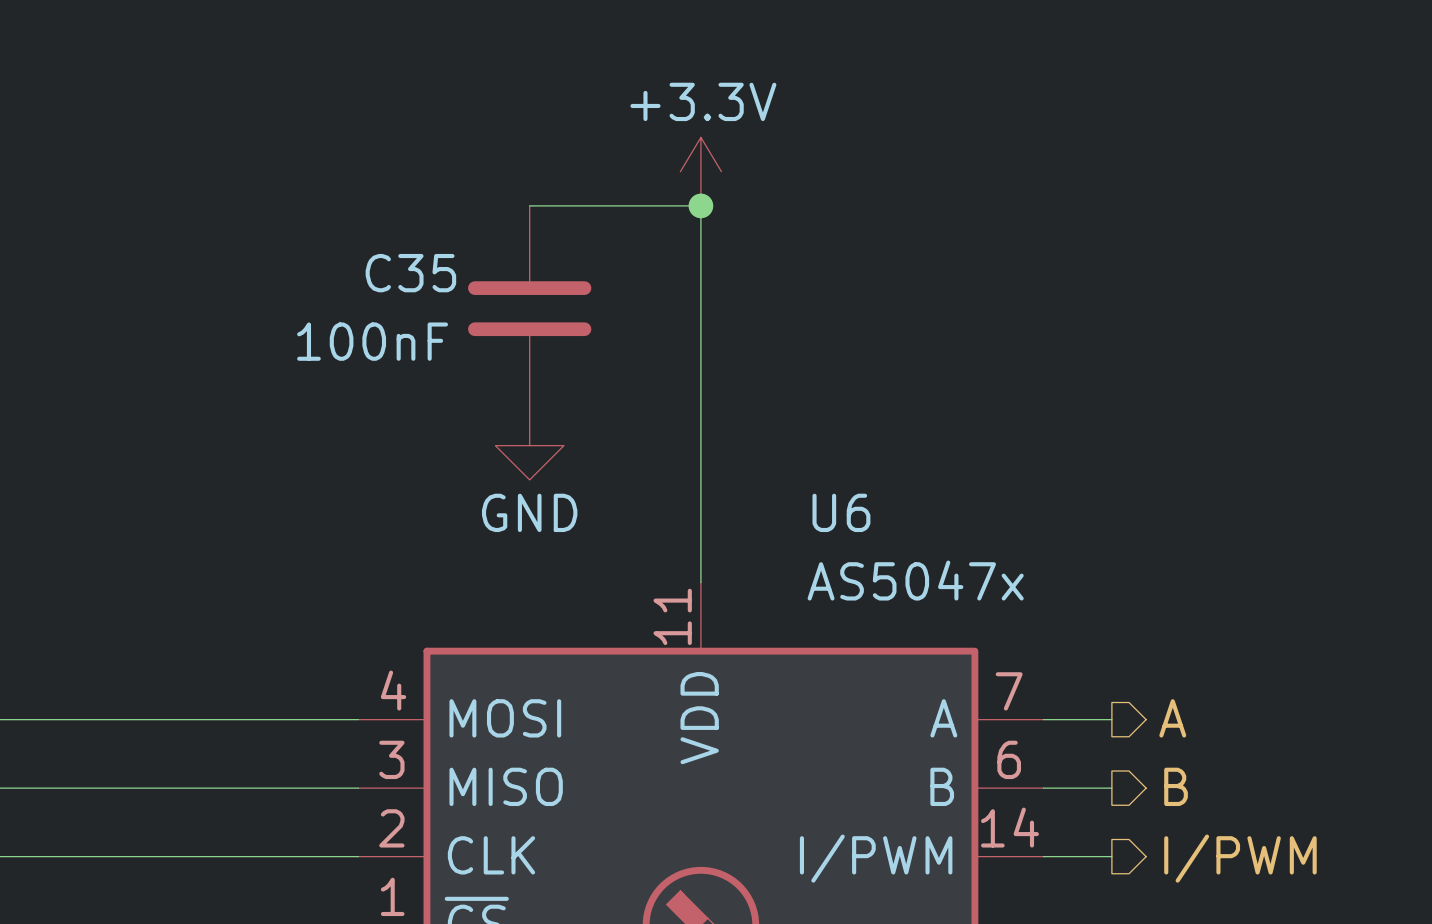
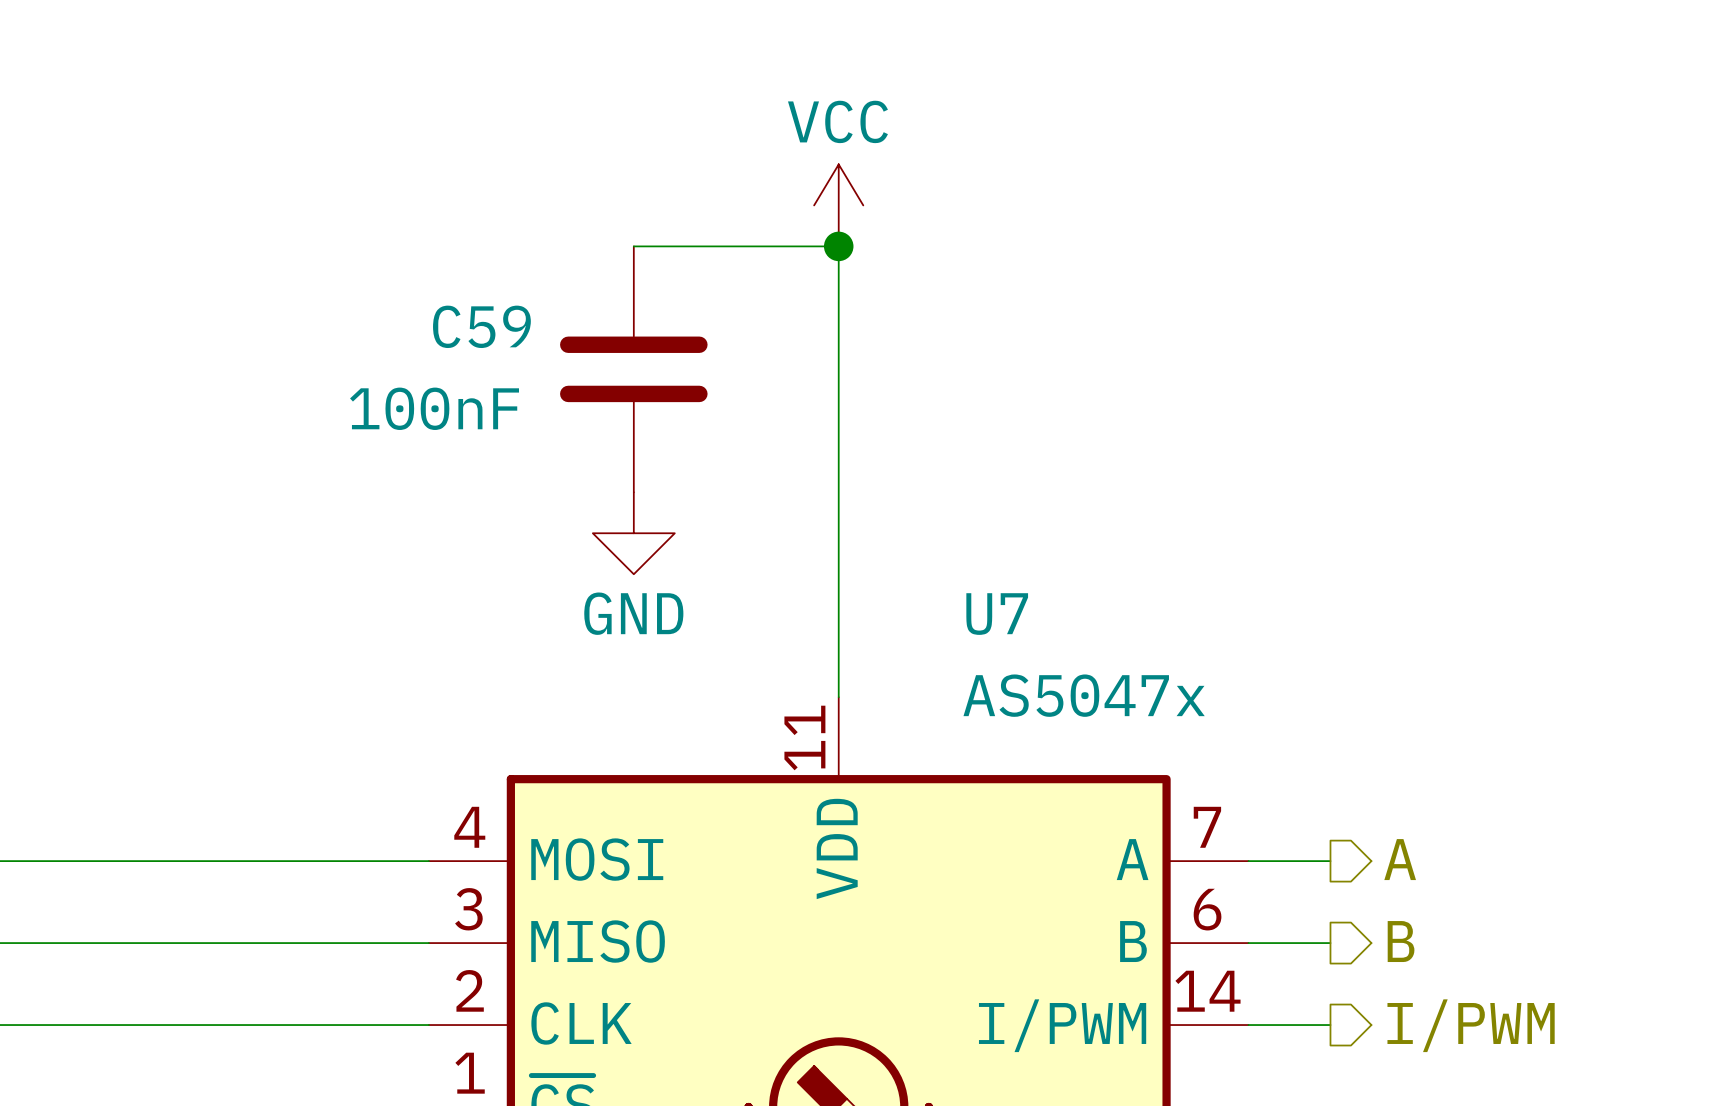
power symbol: +3.3V (700, 171) -> VCC (838, 205)
C35 name: C35 (410, 273) -> C59 (481, 326)
U6 name: U6 (841, 512) -> U7 (997, 614)

